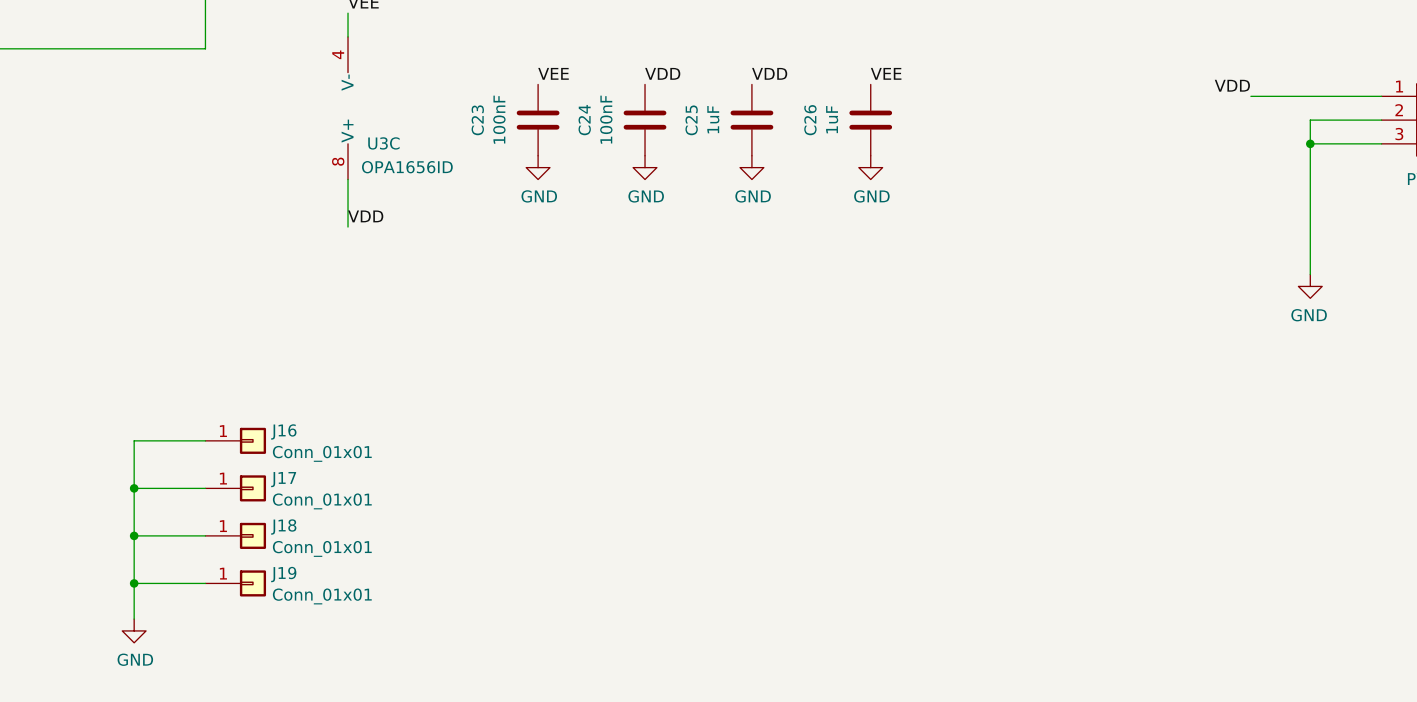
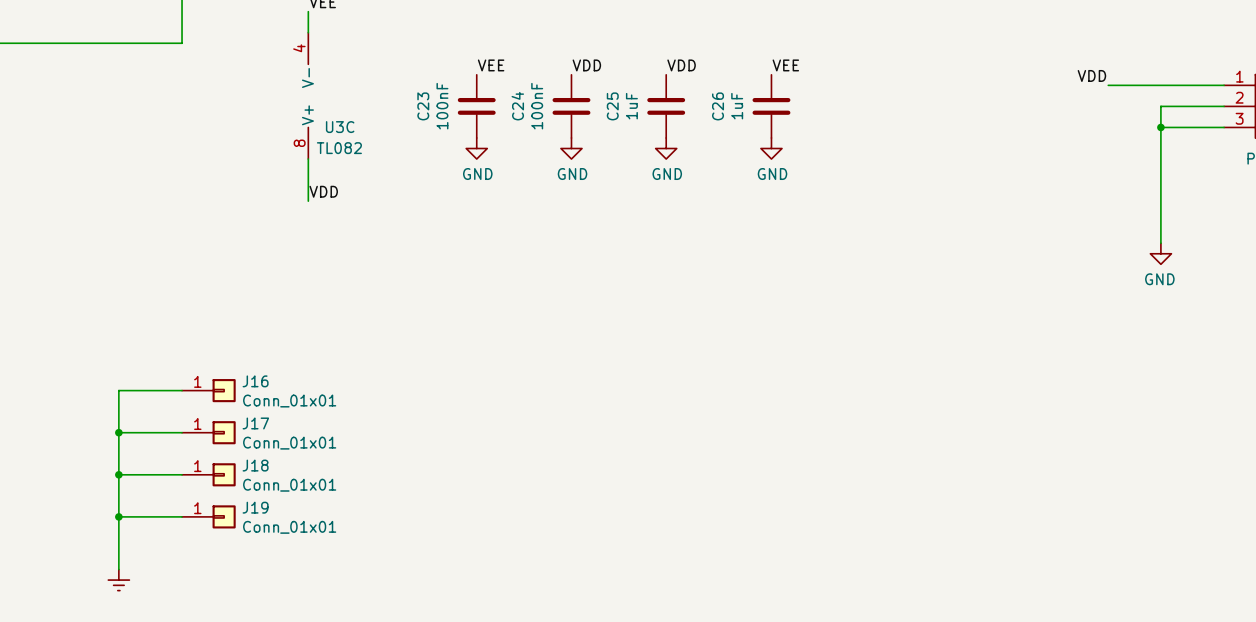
U3C value: OPA1656ID (407, 167) -> TL082 (339, 148)
power symbol: GND (134, 630) -> none
power symbol: none -> (118, 580)

